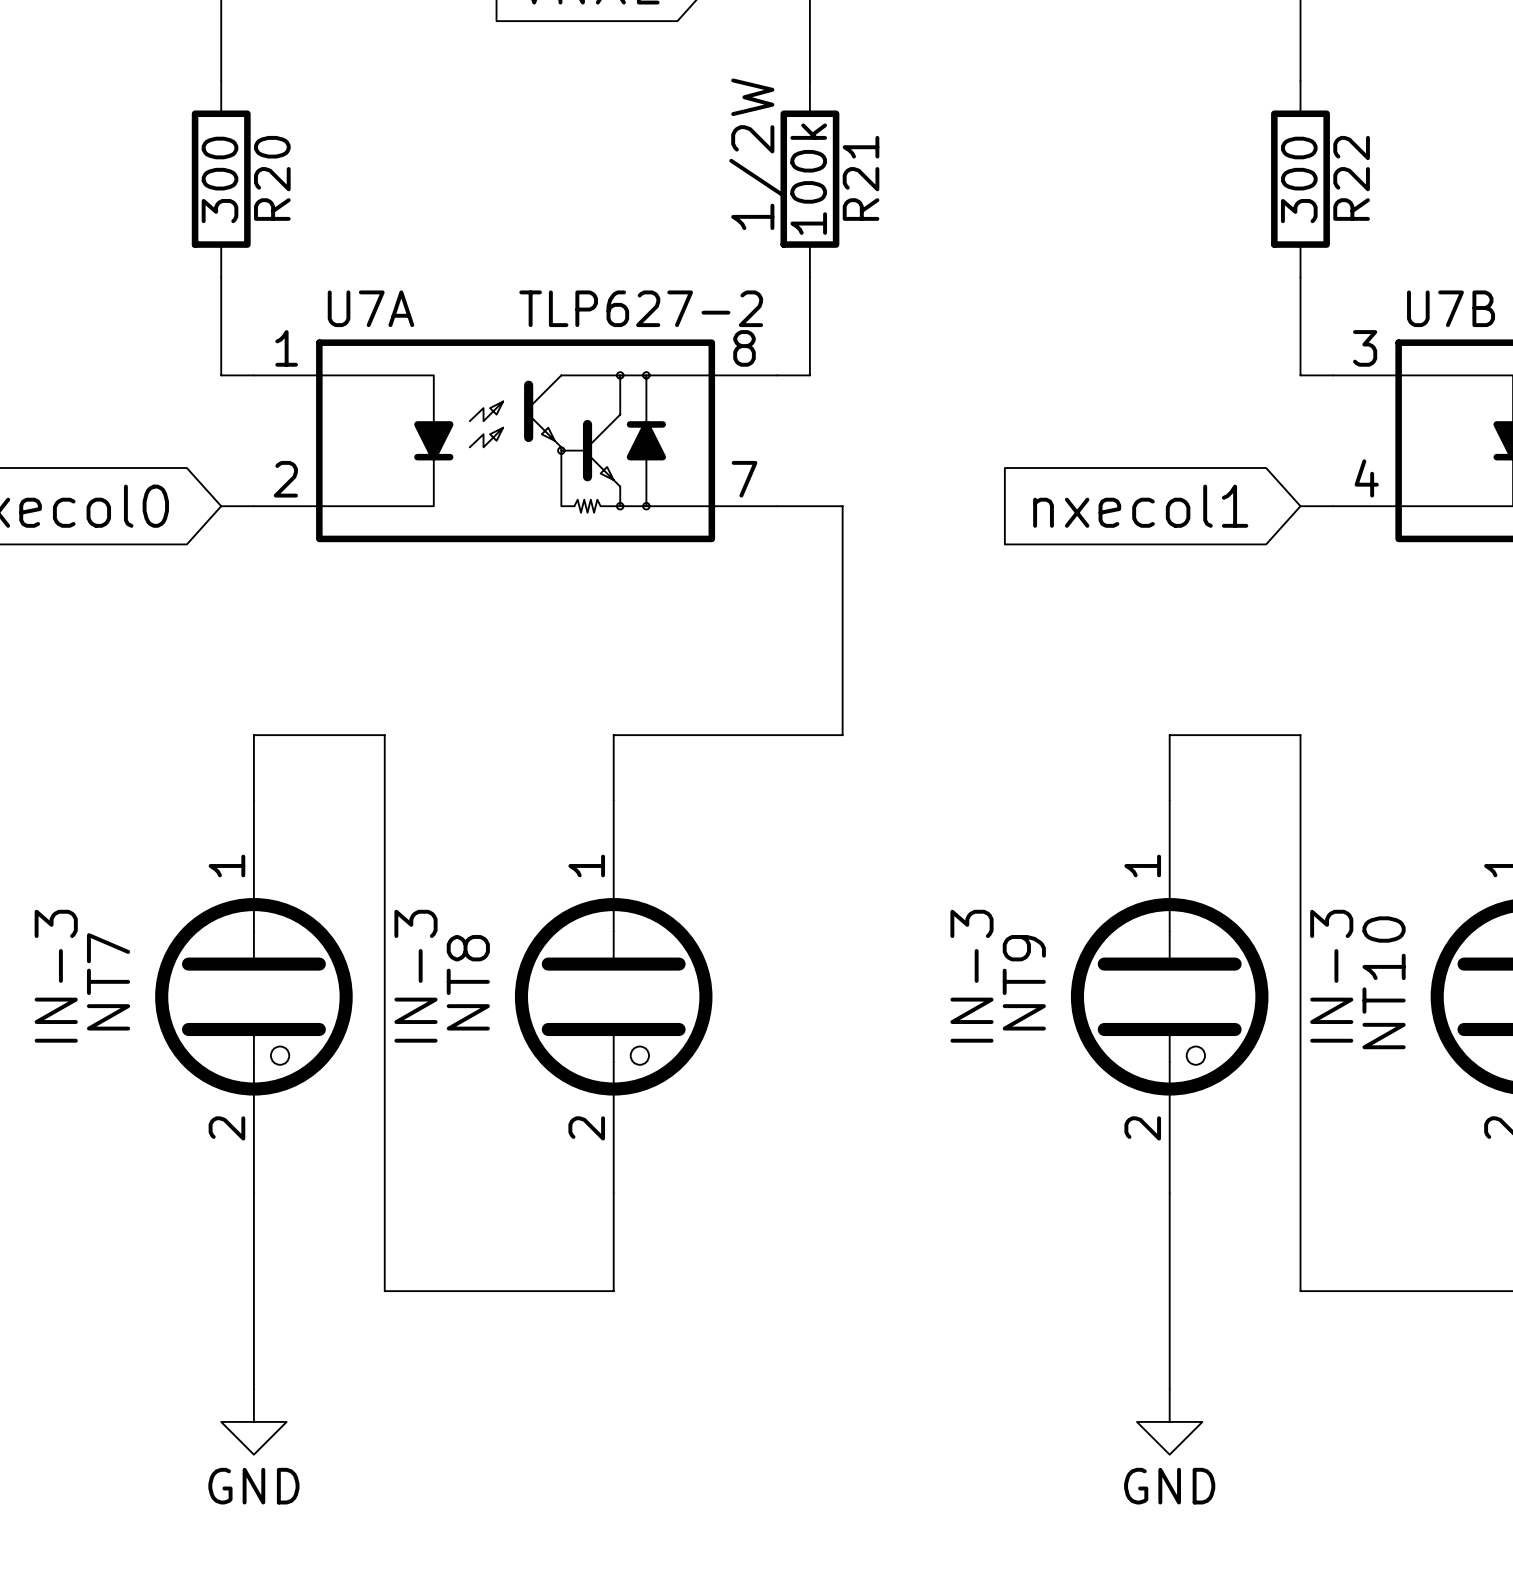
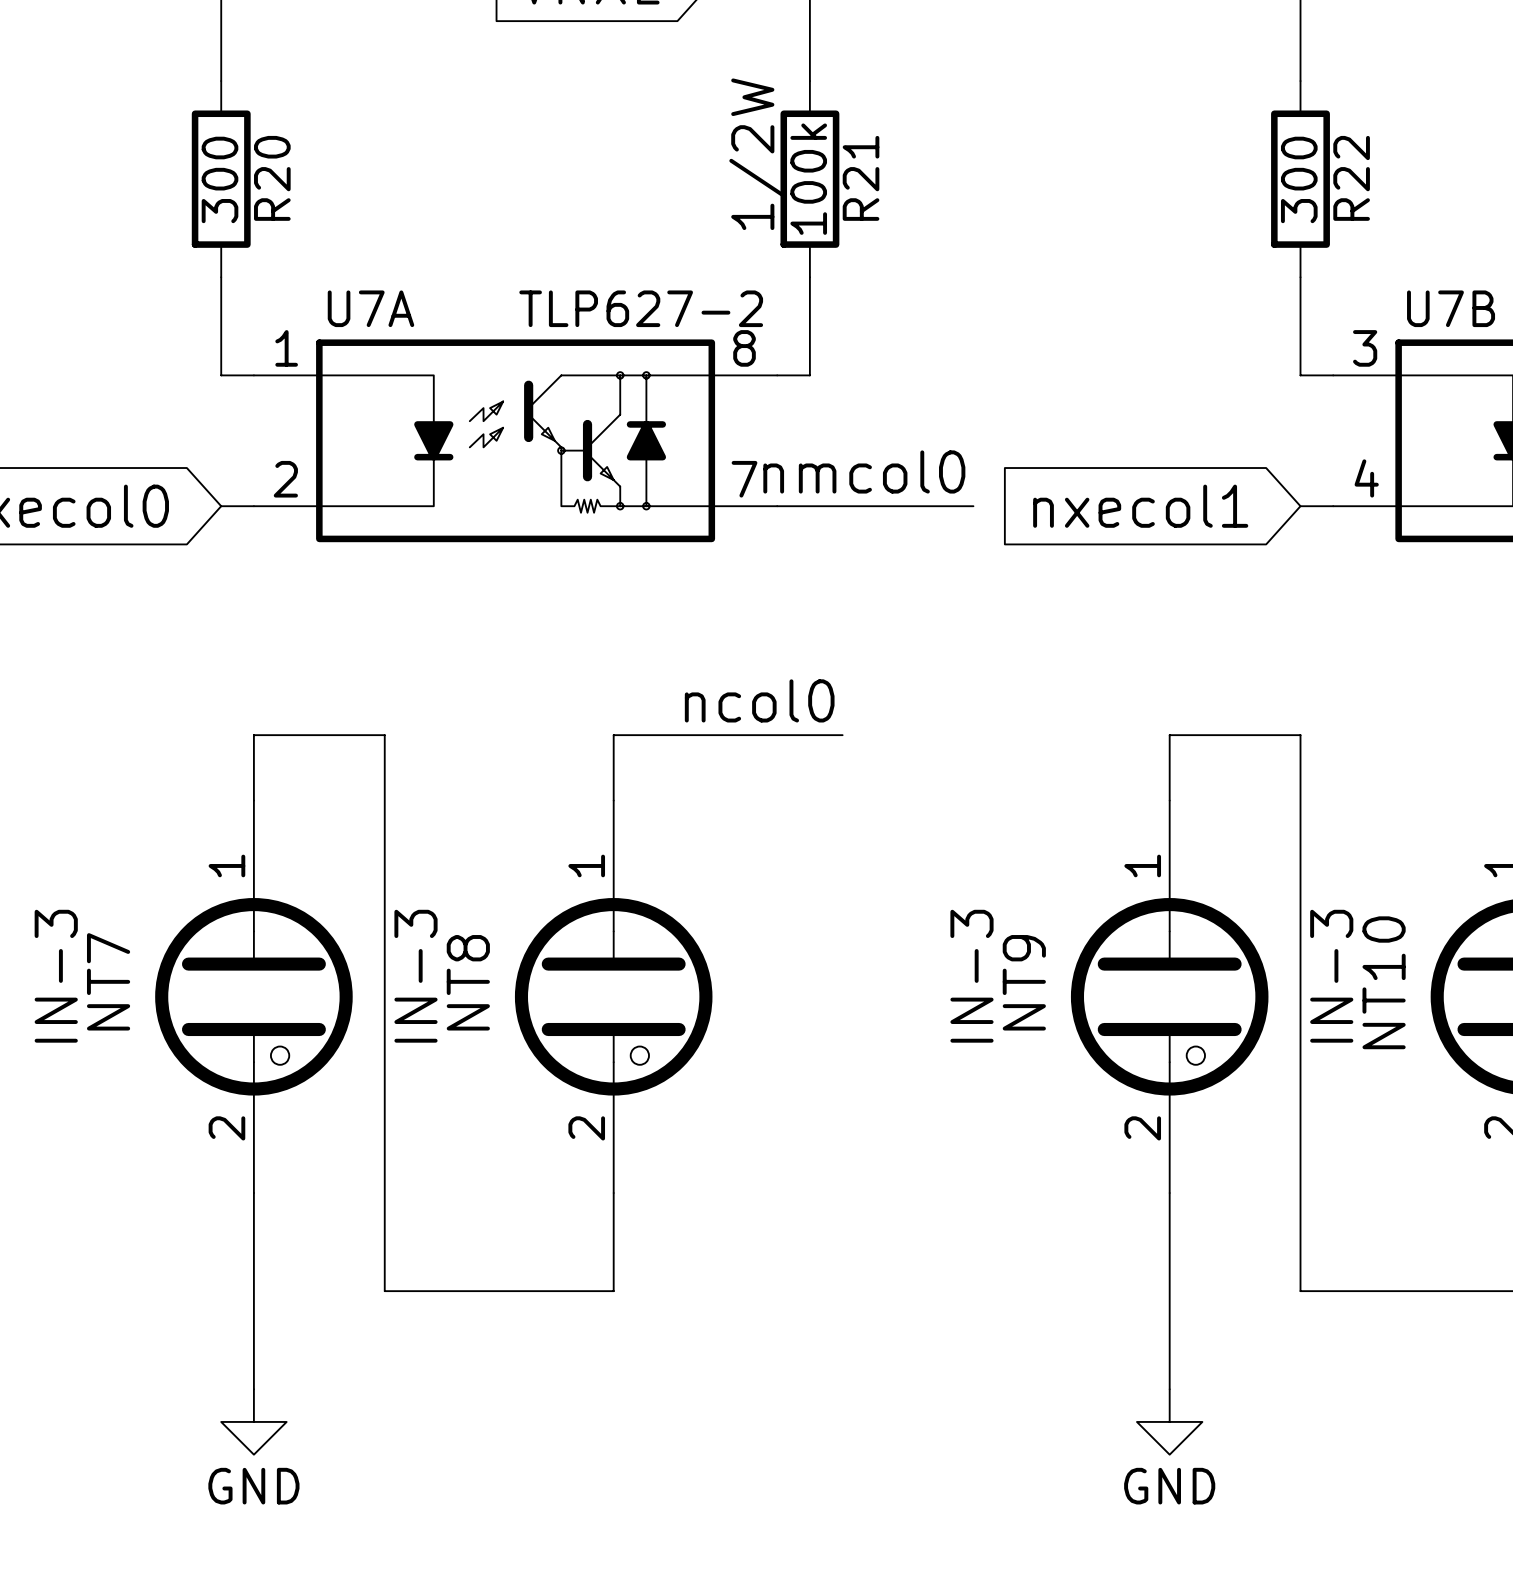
label: none -> nmcol0 (864, 471)
wire: (842, 506) (842, 735) -> (842, 506) (973, 506)
label: none -> ncol0 (759, 700)

